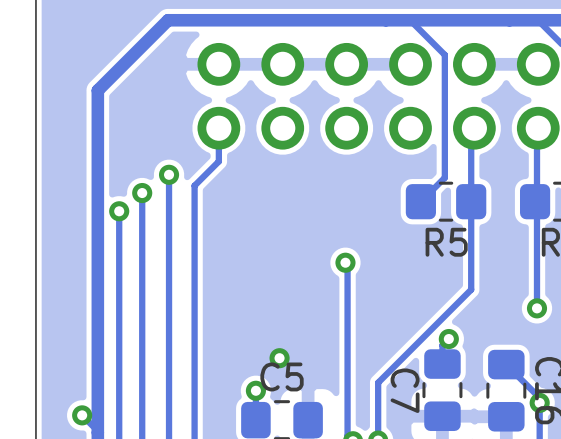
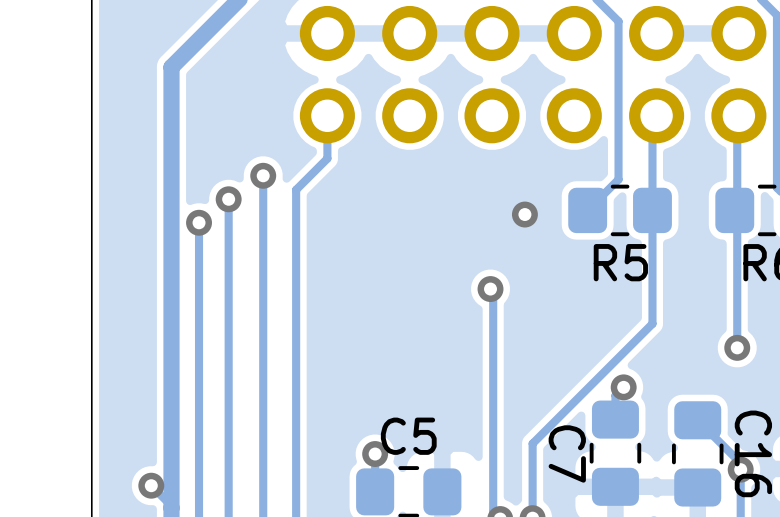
via: none -> (524, 214)
via: (279, 358) -> none

